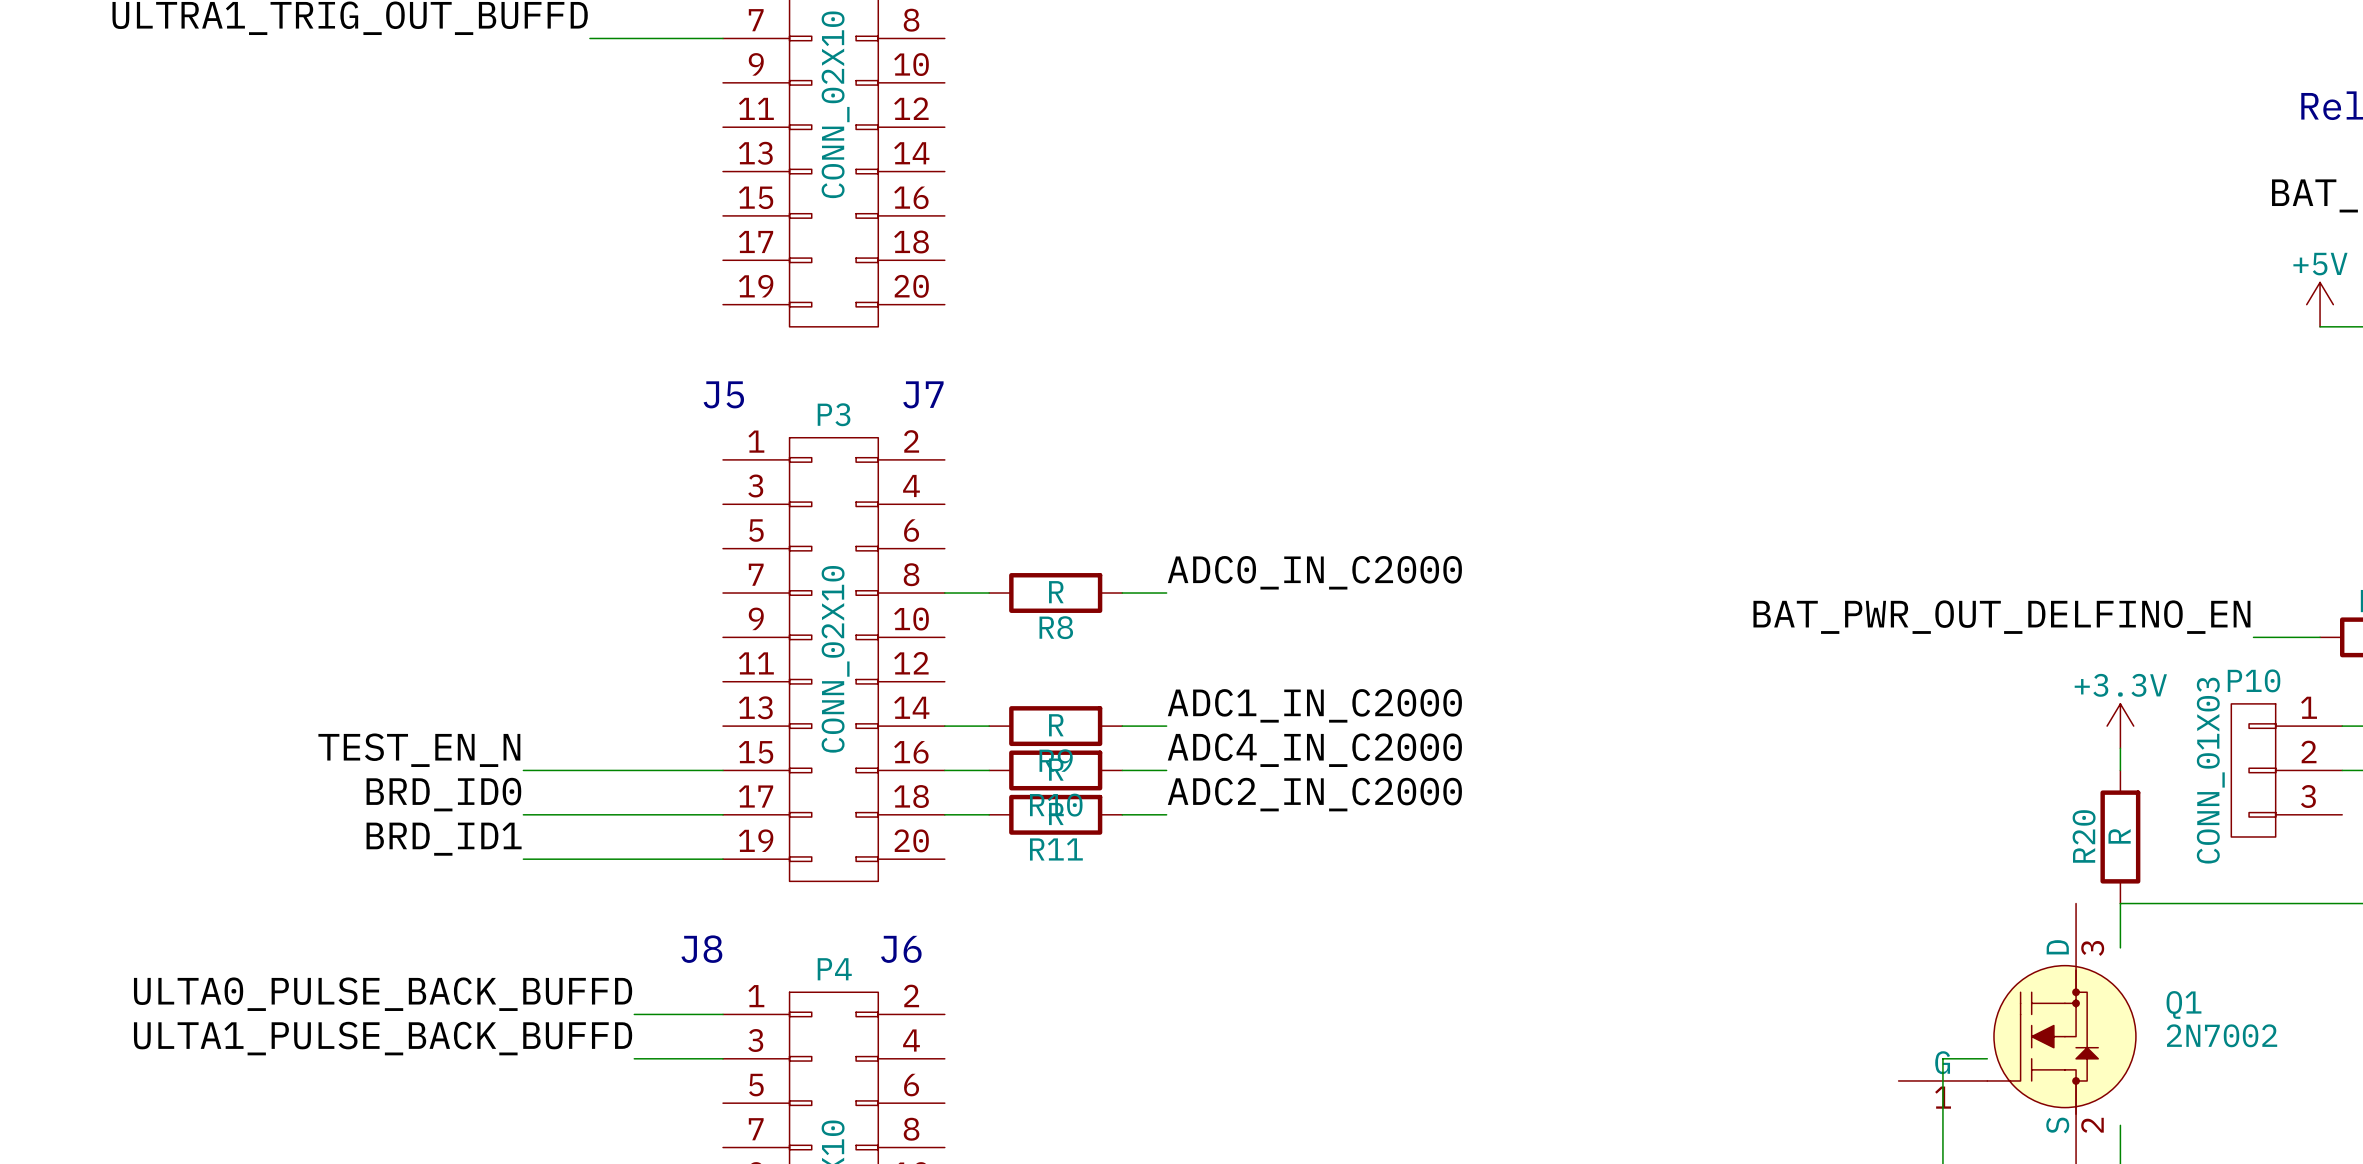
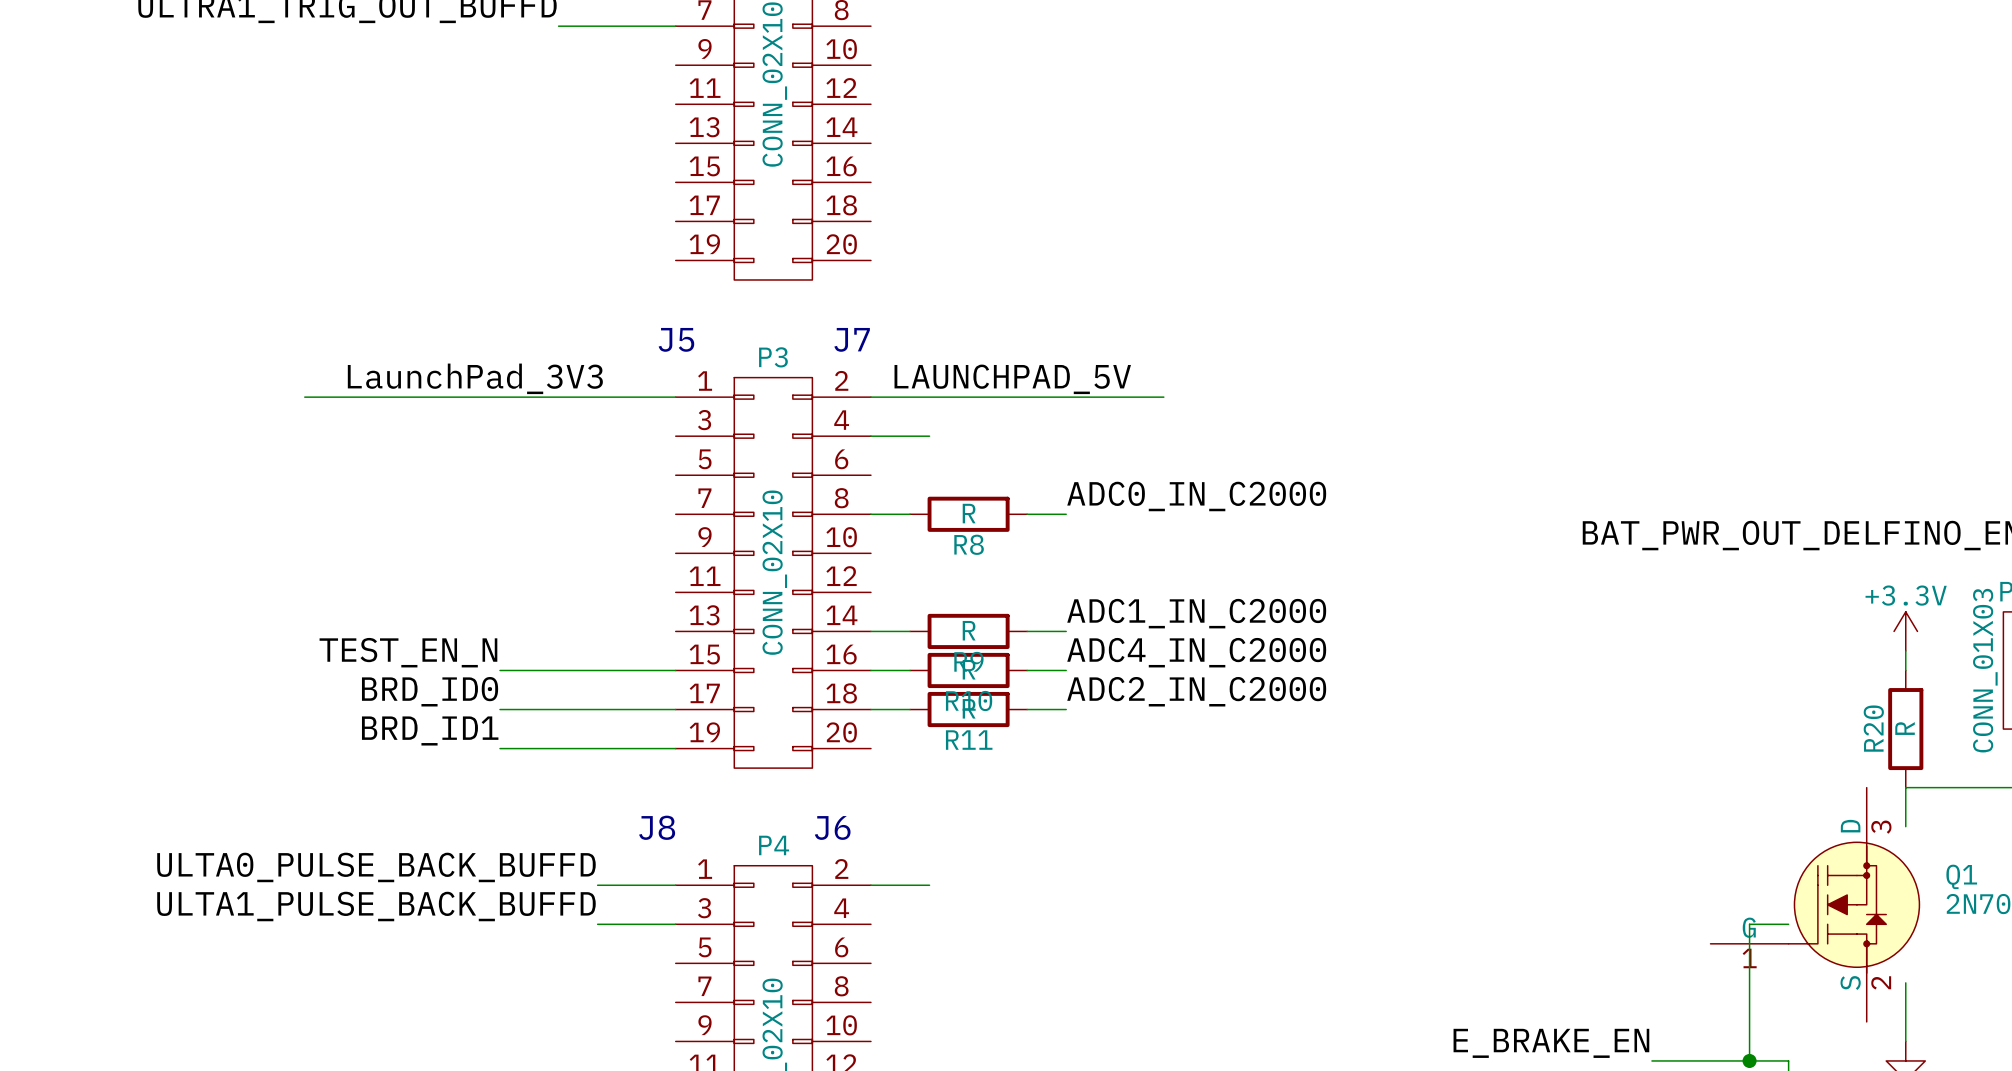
label: none -> LaunchPad_3V3 (475, 378)
label: none -> LAUNCHPAD_5V (1012, 379)
wire: none -> (304, 397) (675, 397)
wire: none -> (870, 397) (1163, 397)
wire: none -> (870, 436) (929, 436)
wire: none -> (870, 885) (929, 885)

